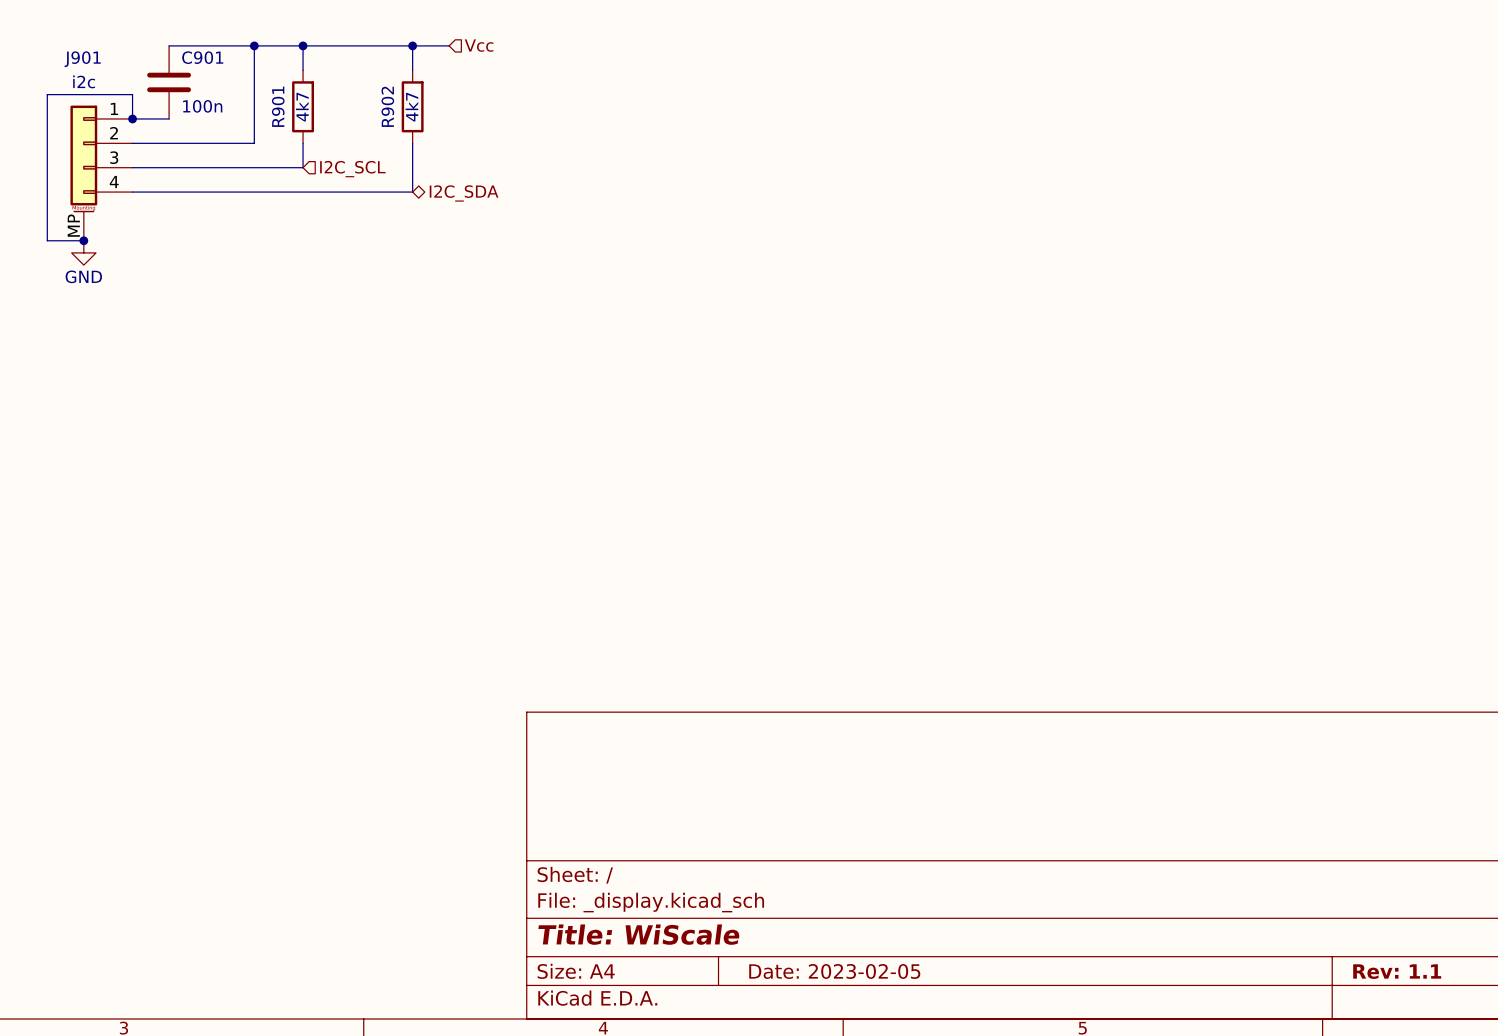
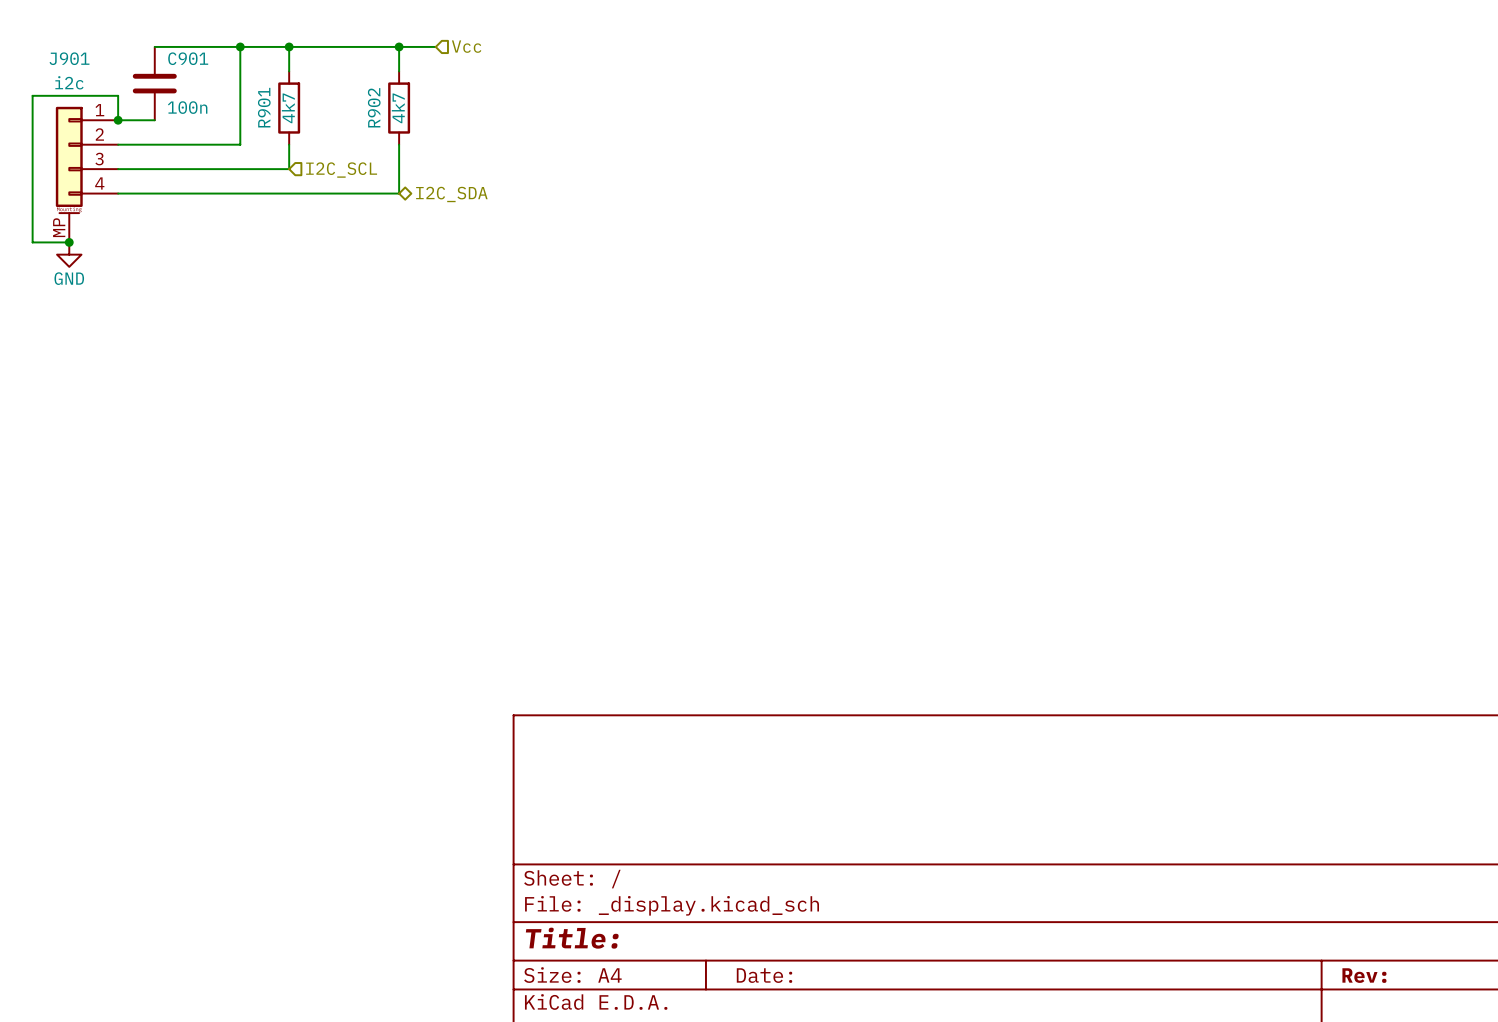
title block: Title: WiScale (639, 934) -> Title: (572, 938)
title block: Date: 2023-02-05 (834, 971) -> Date: (764, 975)
title block: Rev: 1.1 (1397, 971) -> Rev: (1364, 975)

